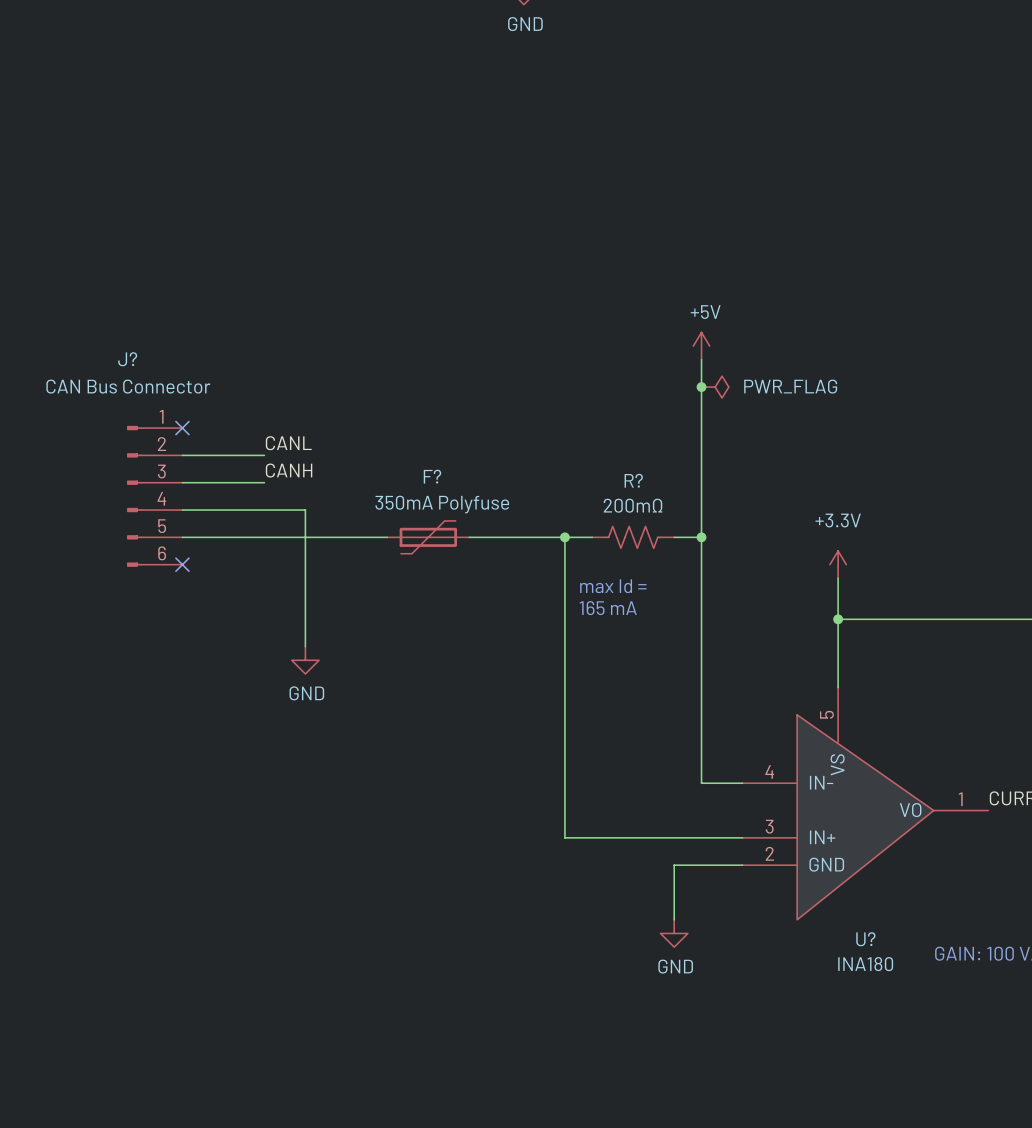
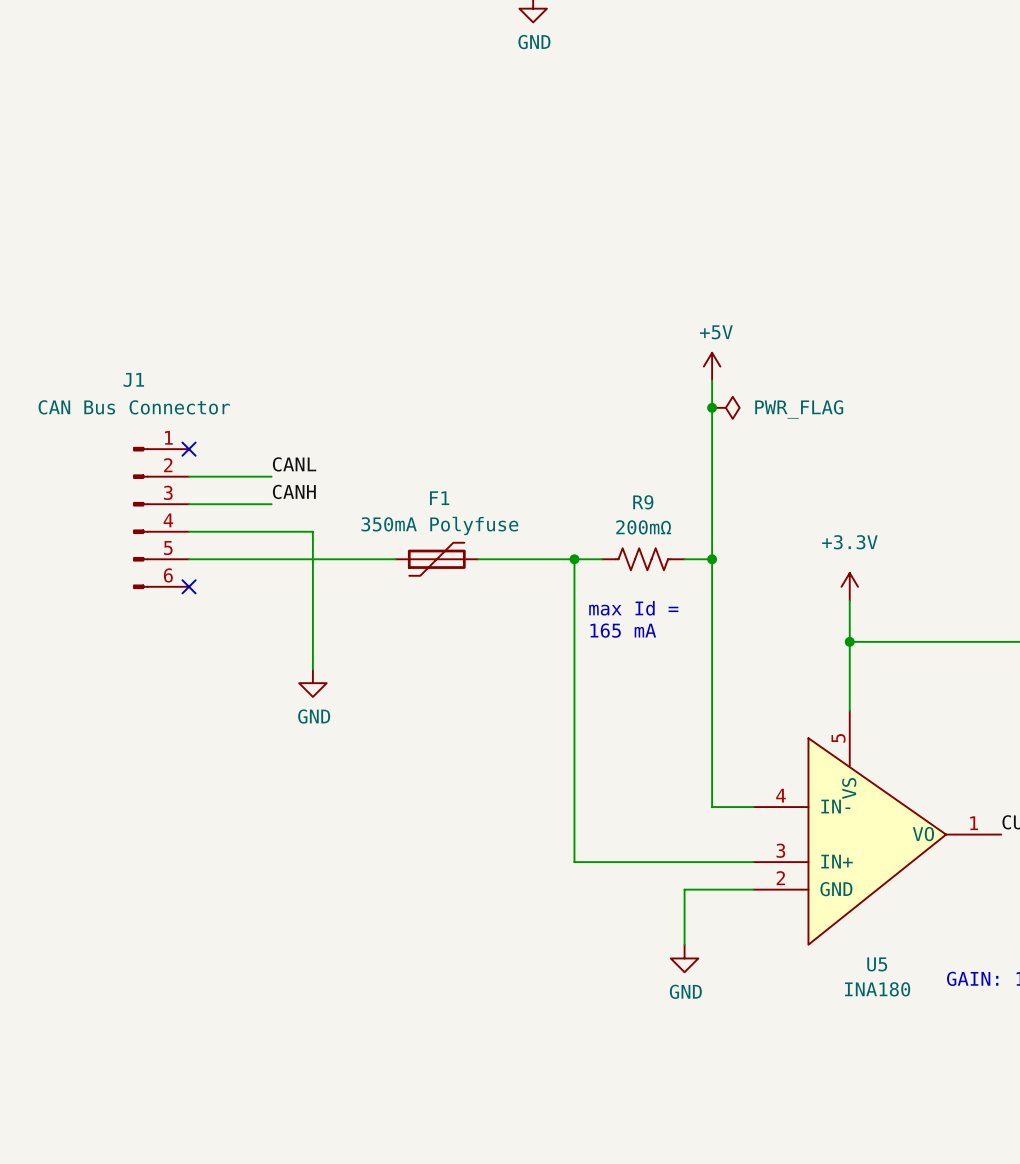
J? name: J? (127, 359) -> J1 (133, 379)
F? name: F? (432, 476) -> F1 (439, 498)
R? name: R? (633, 480) -> R9 (643, 502)
U? name: U? (865, 939) -> U5 (877, 964)

